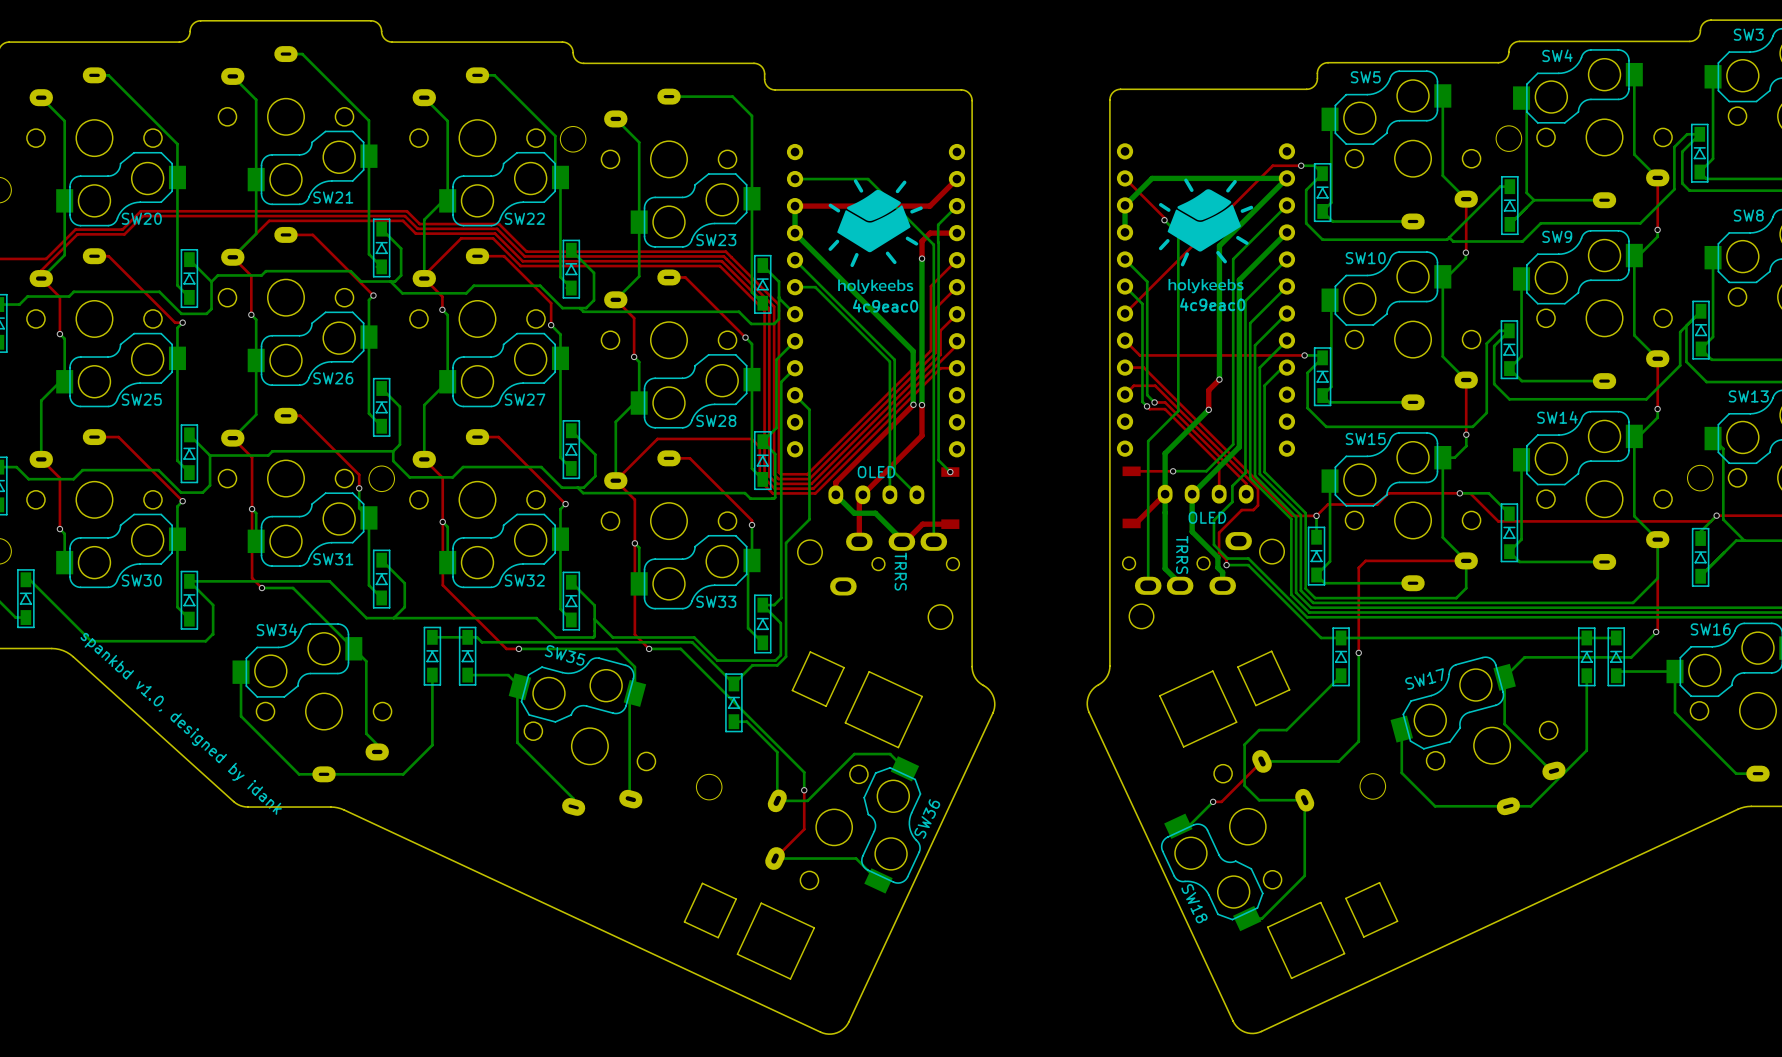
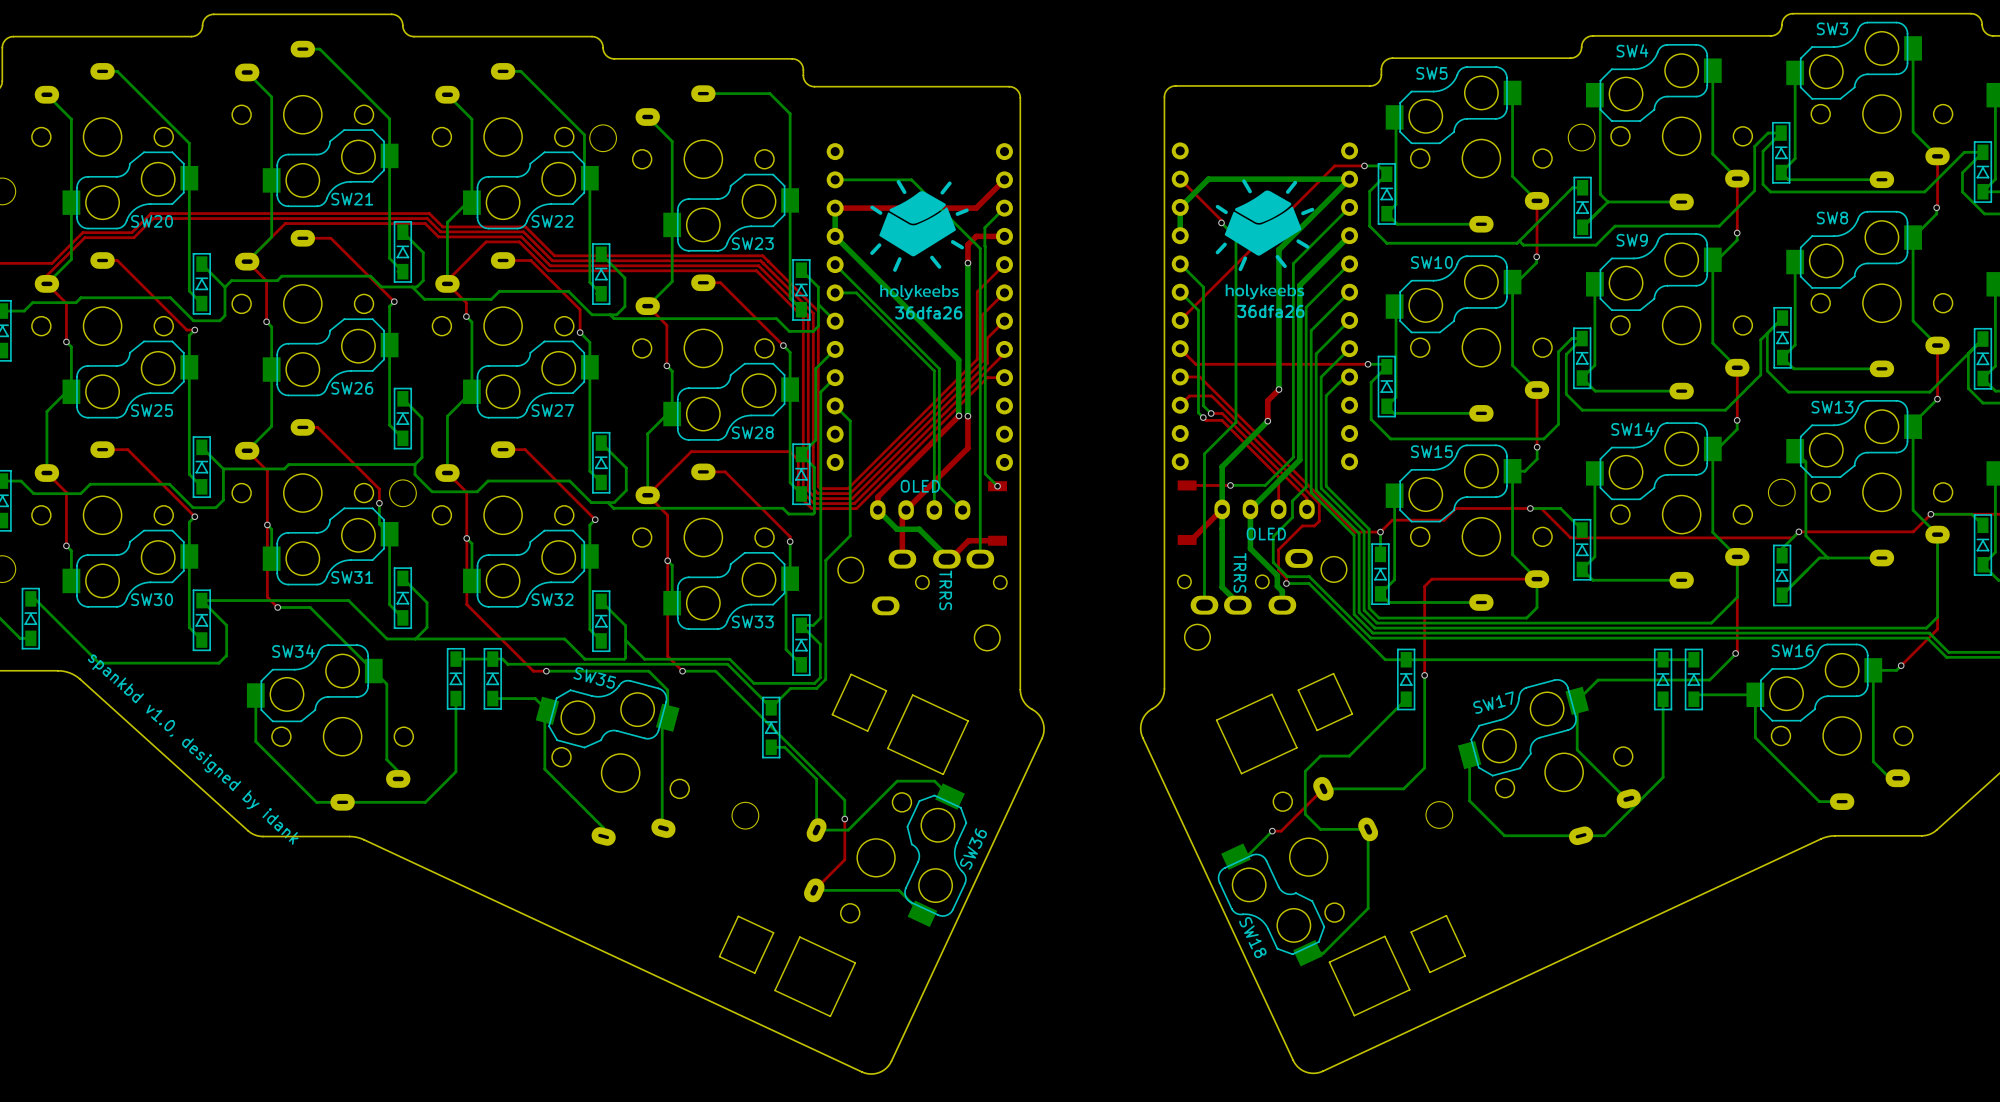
text: 4c9eac0 (1212, 304) -> 36dfa26 (1270, 311)
text: 4c9eac0 (885, 306) -> 36dfa26 (928, 312)

